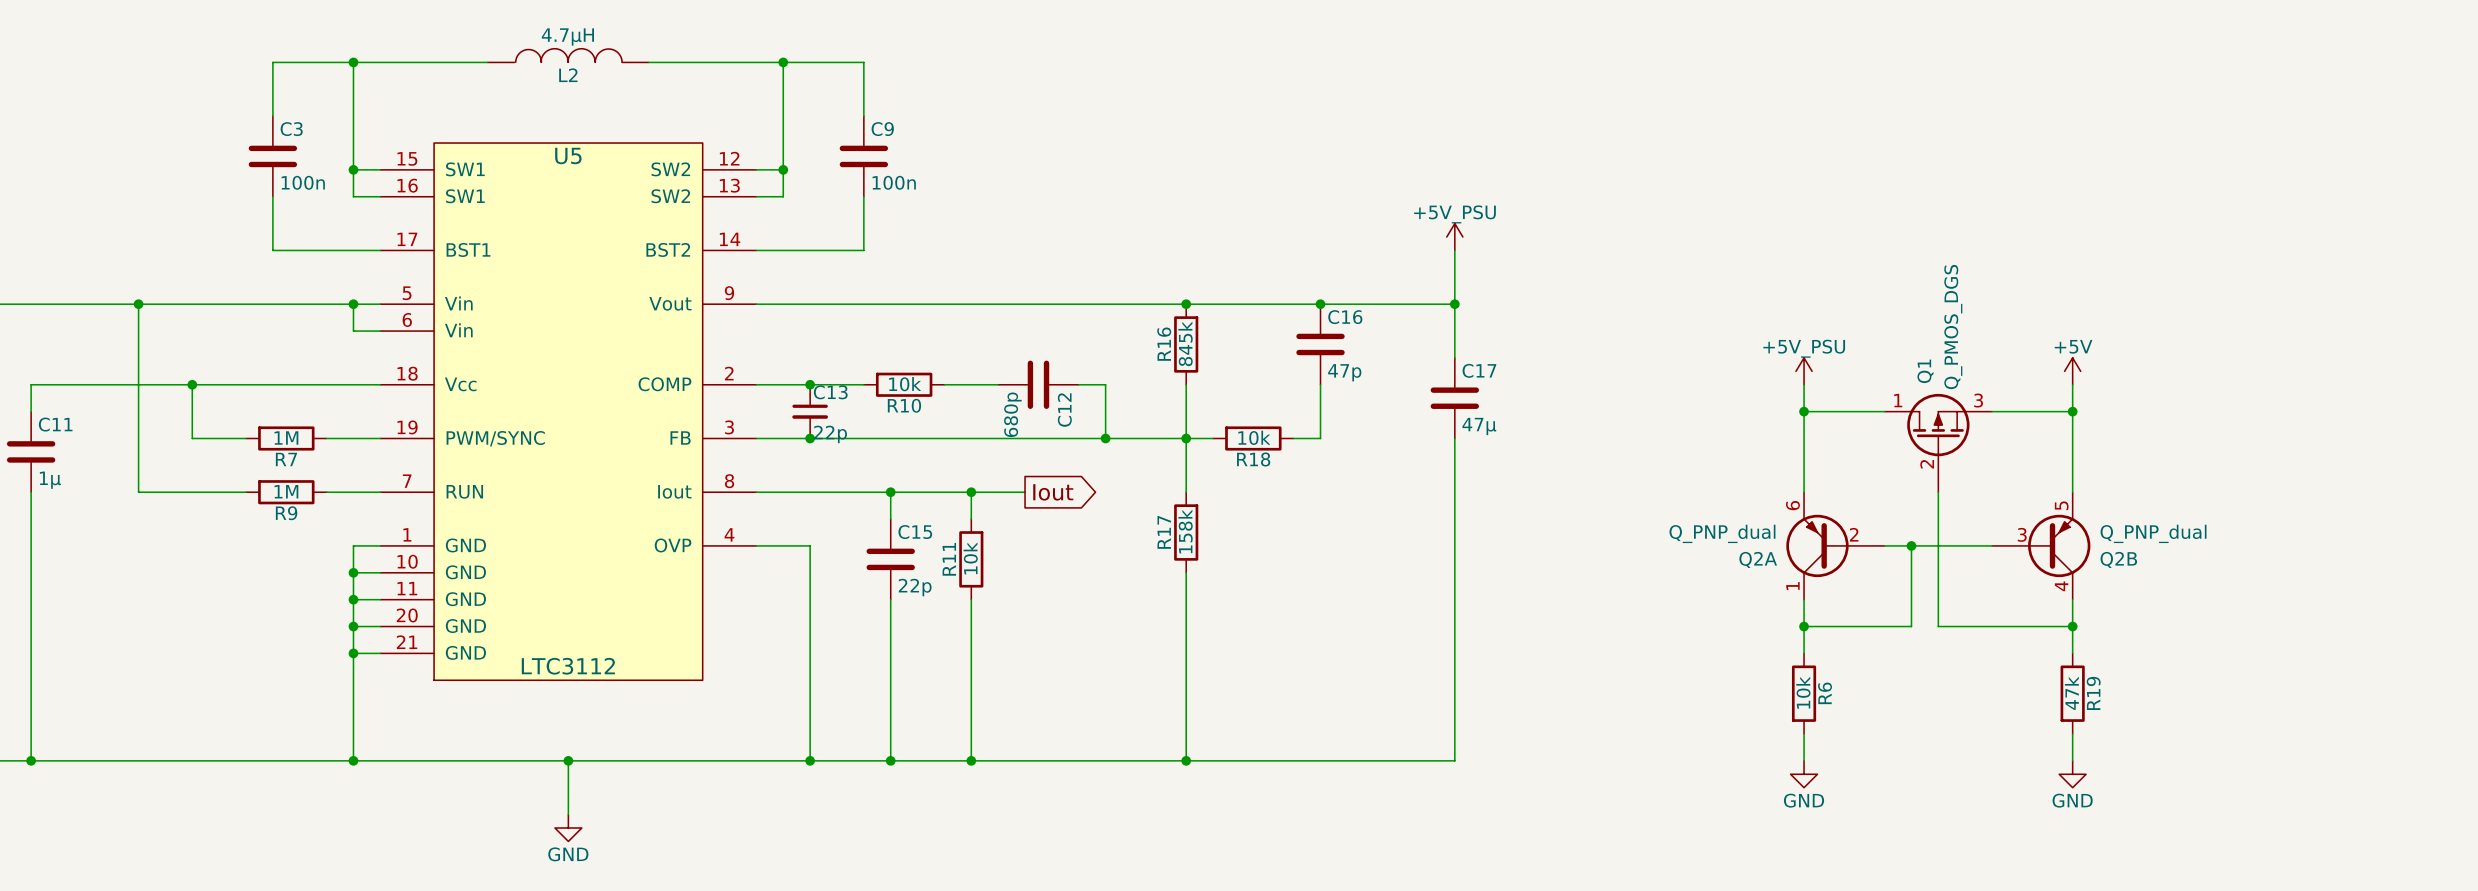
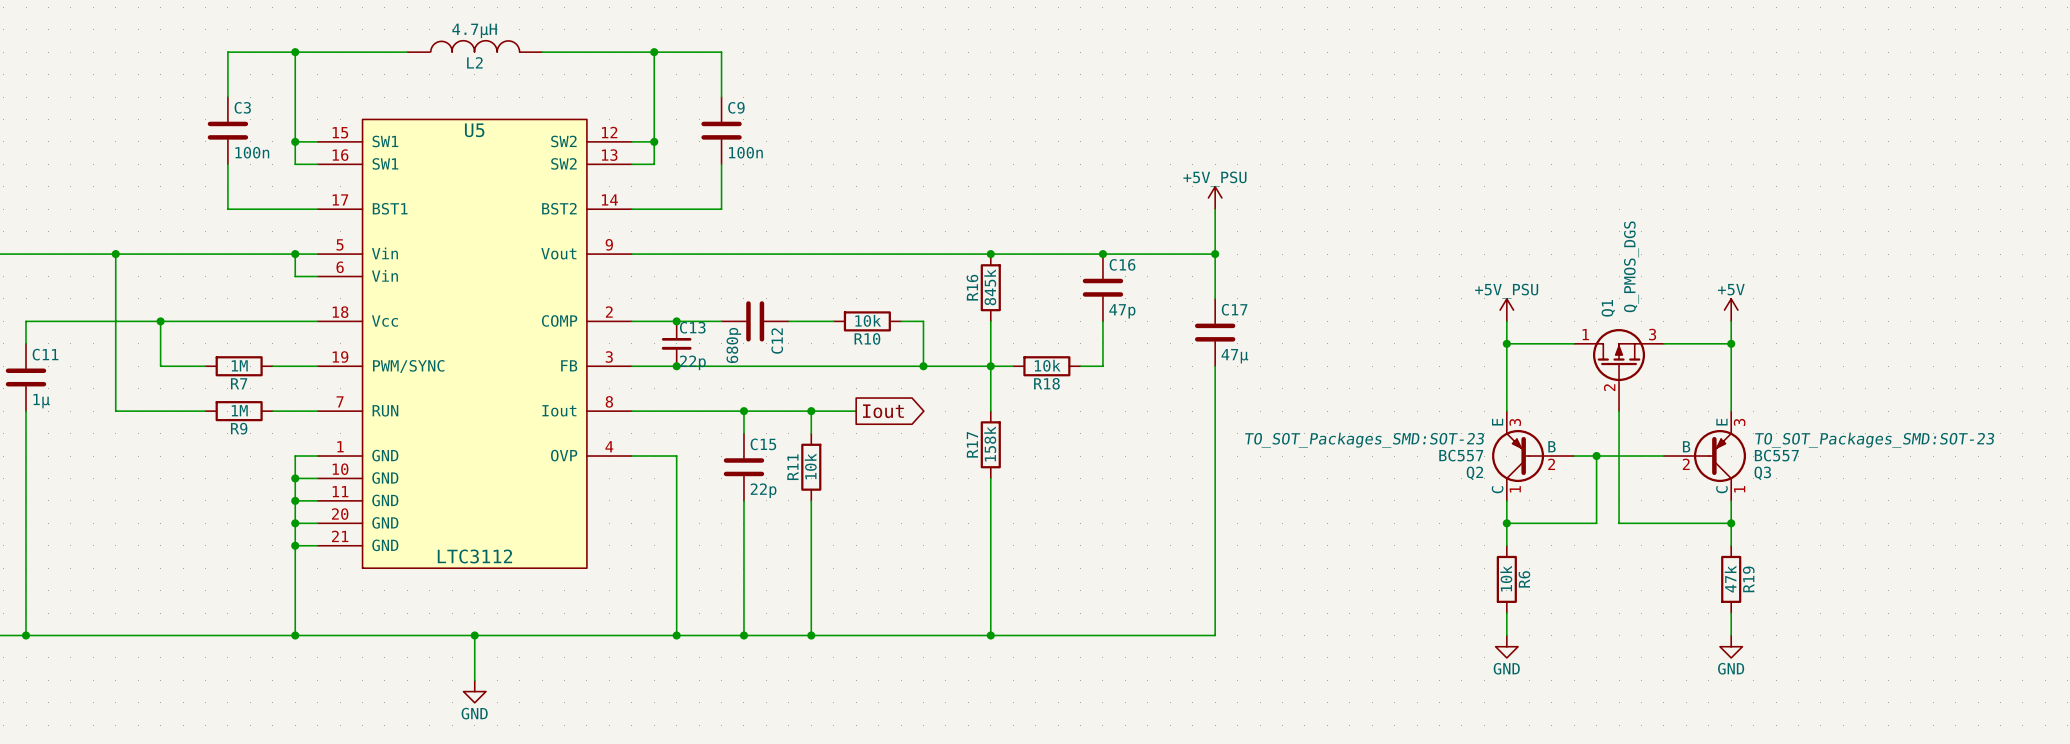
R10 position: (904, 384) -> (867, 321)
C12 position: (1038, 384) -> (755, 321)
Q2A: Q_PNP_dual (1835, 545) -> none
Q2: none -> BC557 (1533, 456)
Q2B: Q_PNP_dual (2041, 545) -> none
Q3: none -> BC557 (1704, 456)

